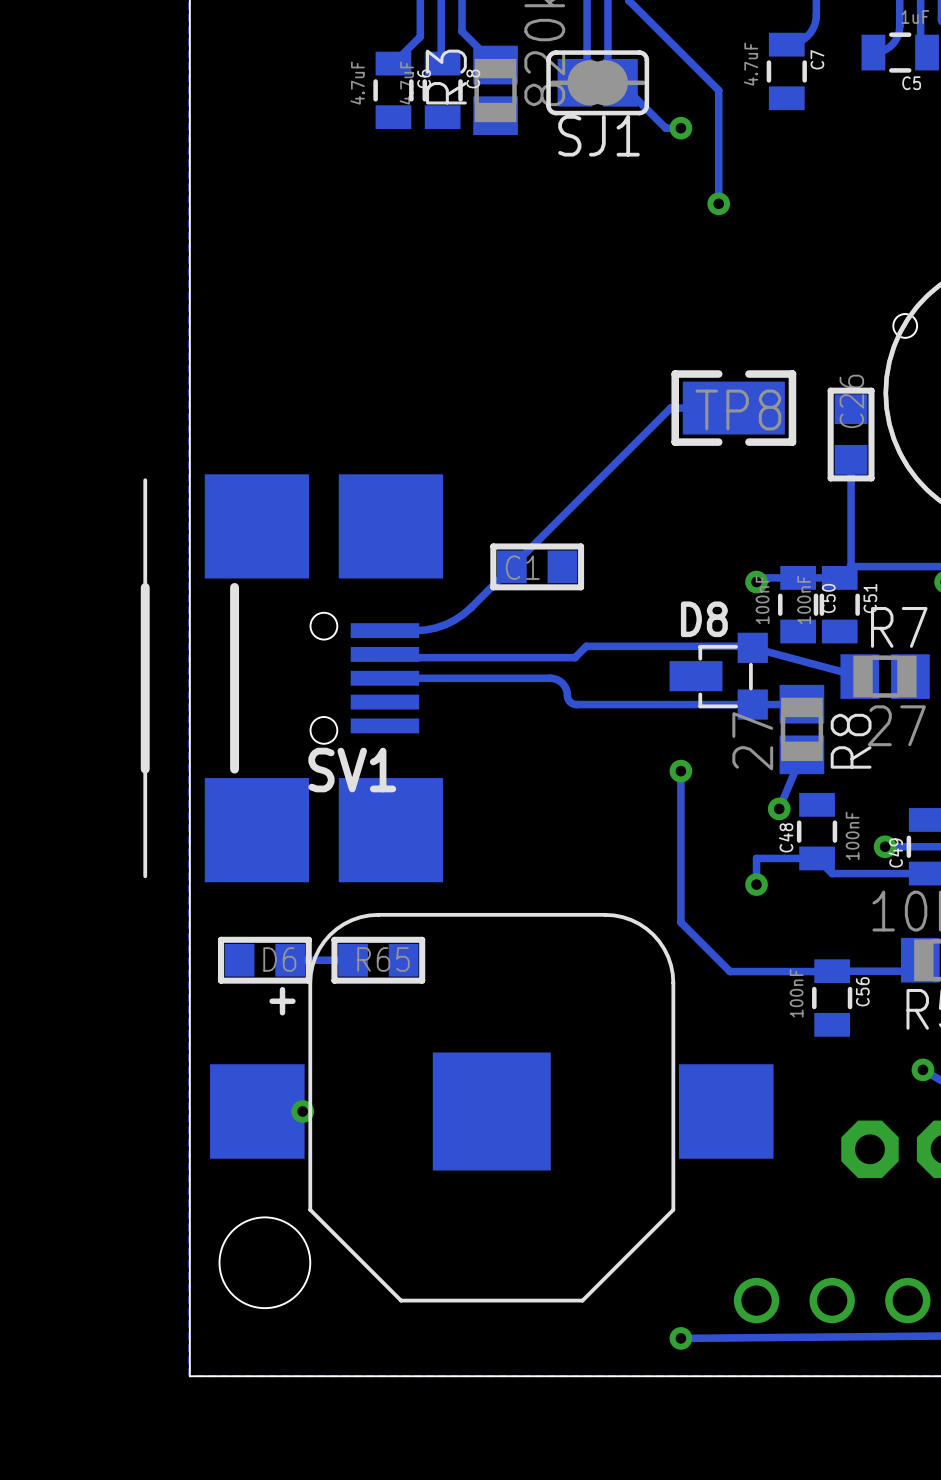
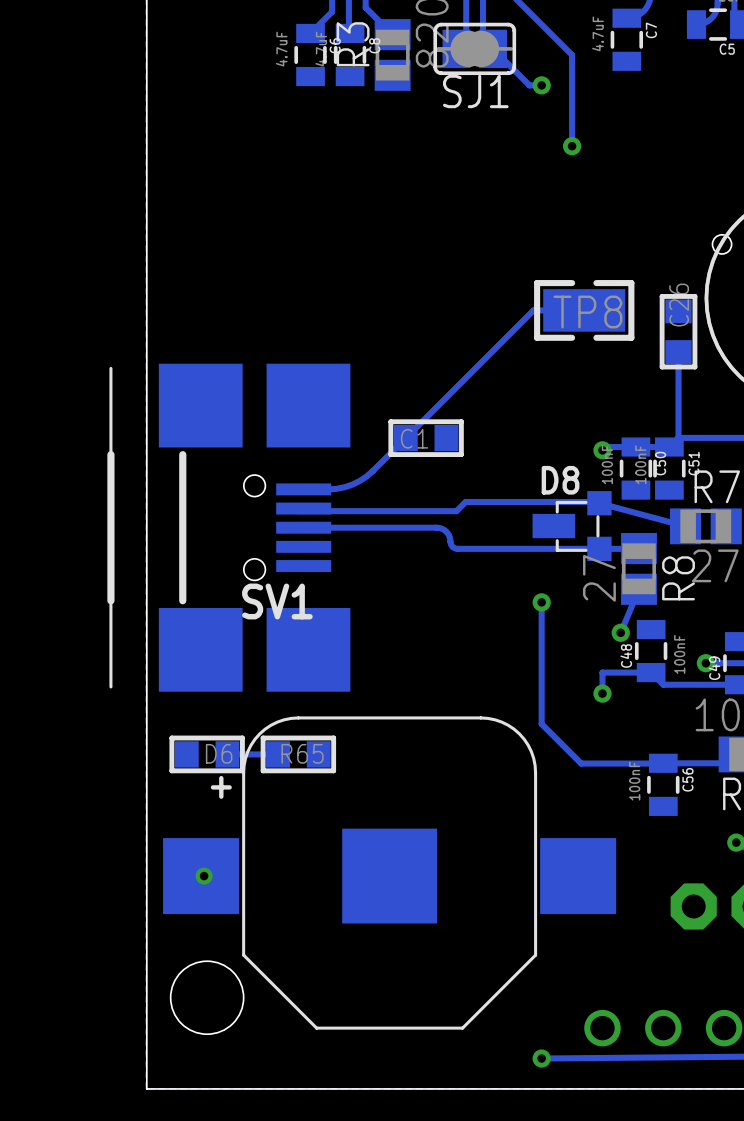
via: none -> (204, 876)
via: (302, 1111) -> none

